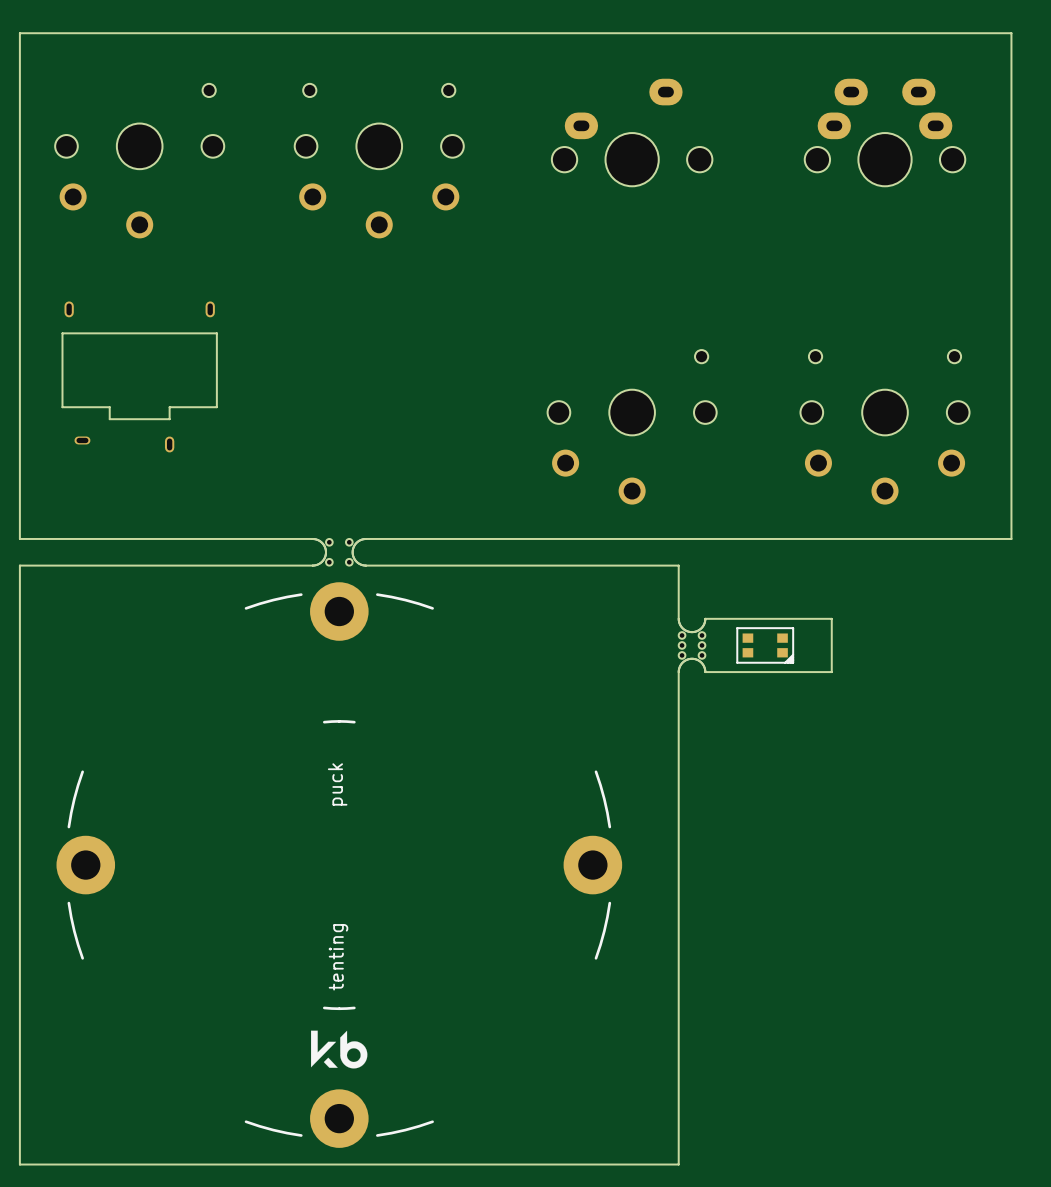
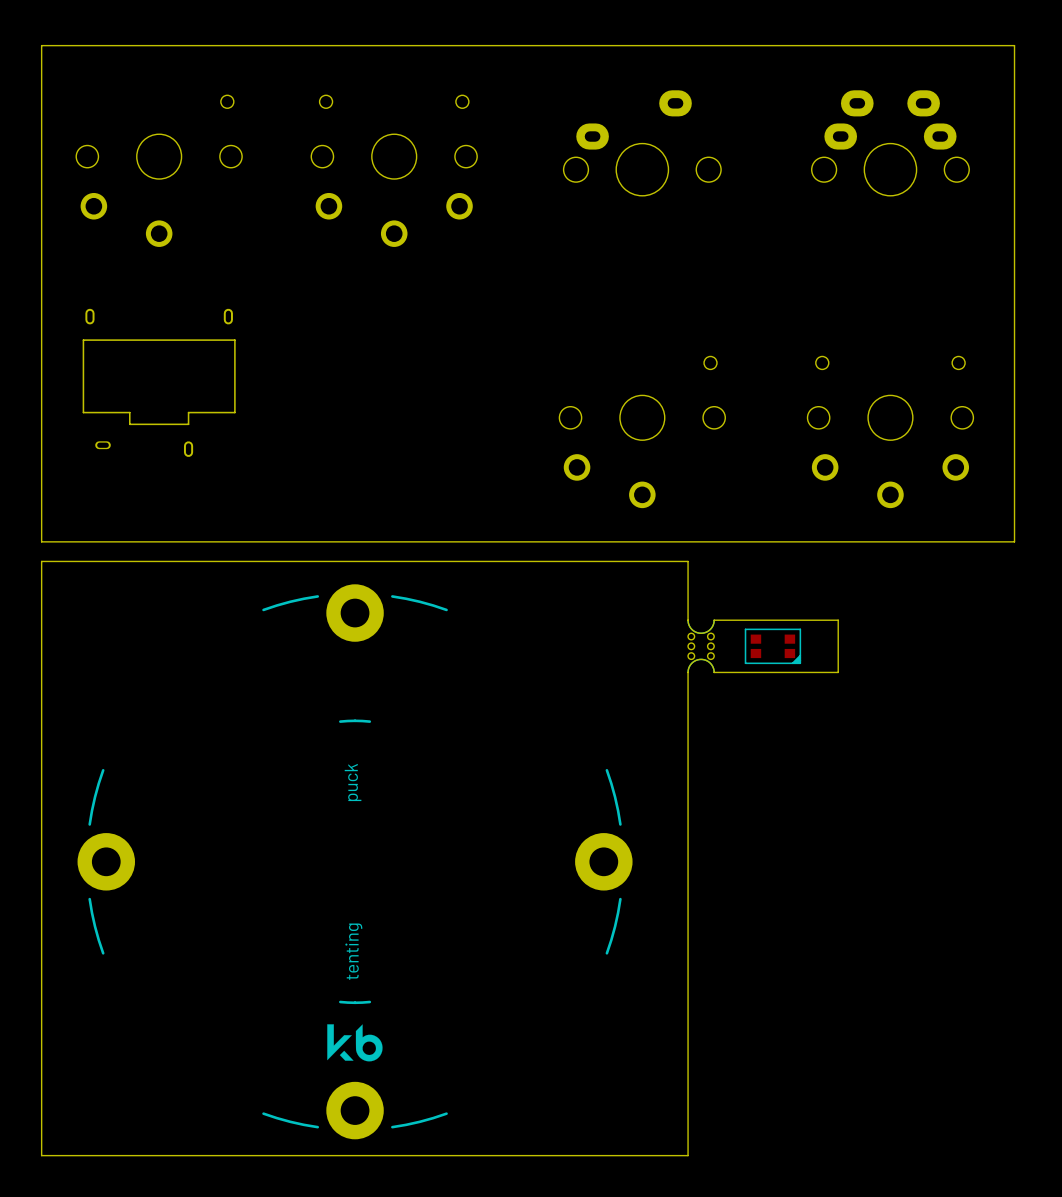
board edge: (312, 538) (322, 542) (326, 552) (323, 560) (314, 565) (19, 565) -> (328, 541) (381, 541)
board edge: (365, 538) (356, 542) (352, 552) (355, 560) (364, 565) (678, 565) -> (41, 567) (41, 561) (688, 561) (688, 567)
part: (339, 552) -> none

